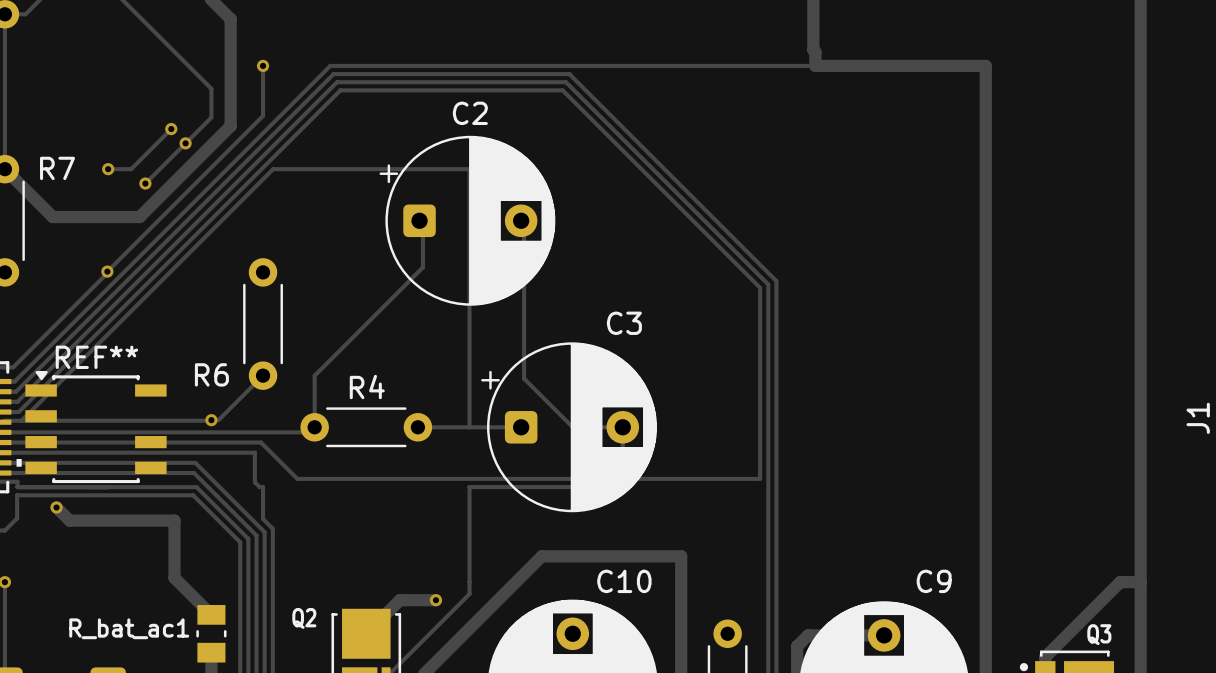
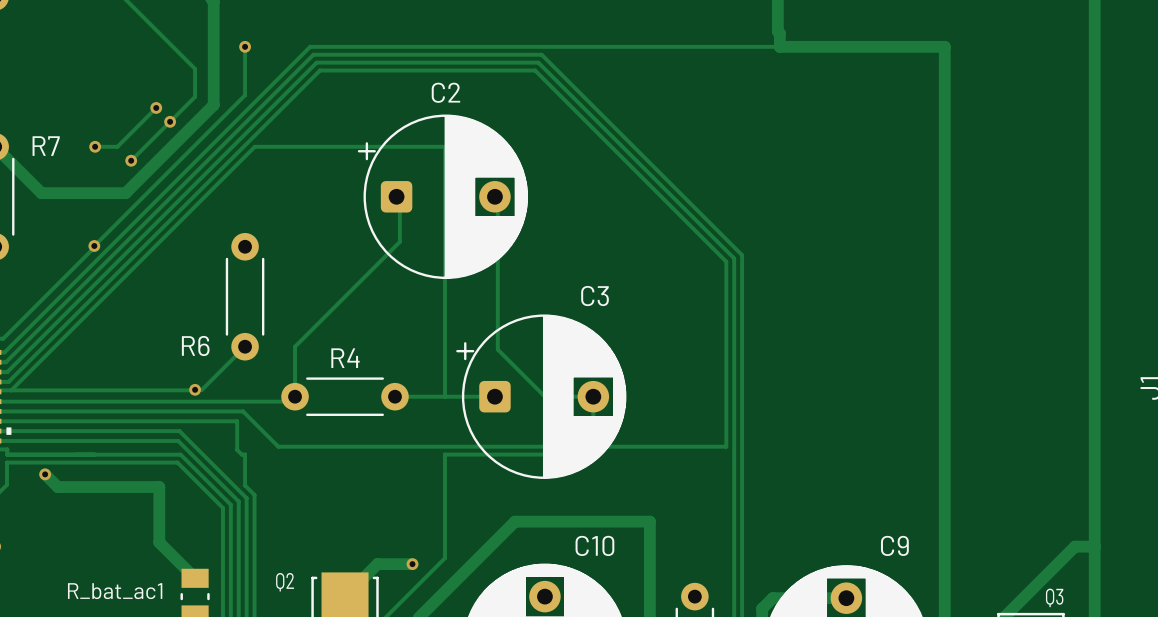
REF**: (95, 427) -> none

